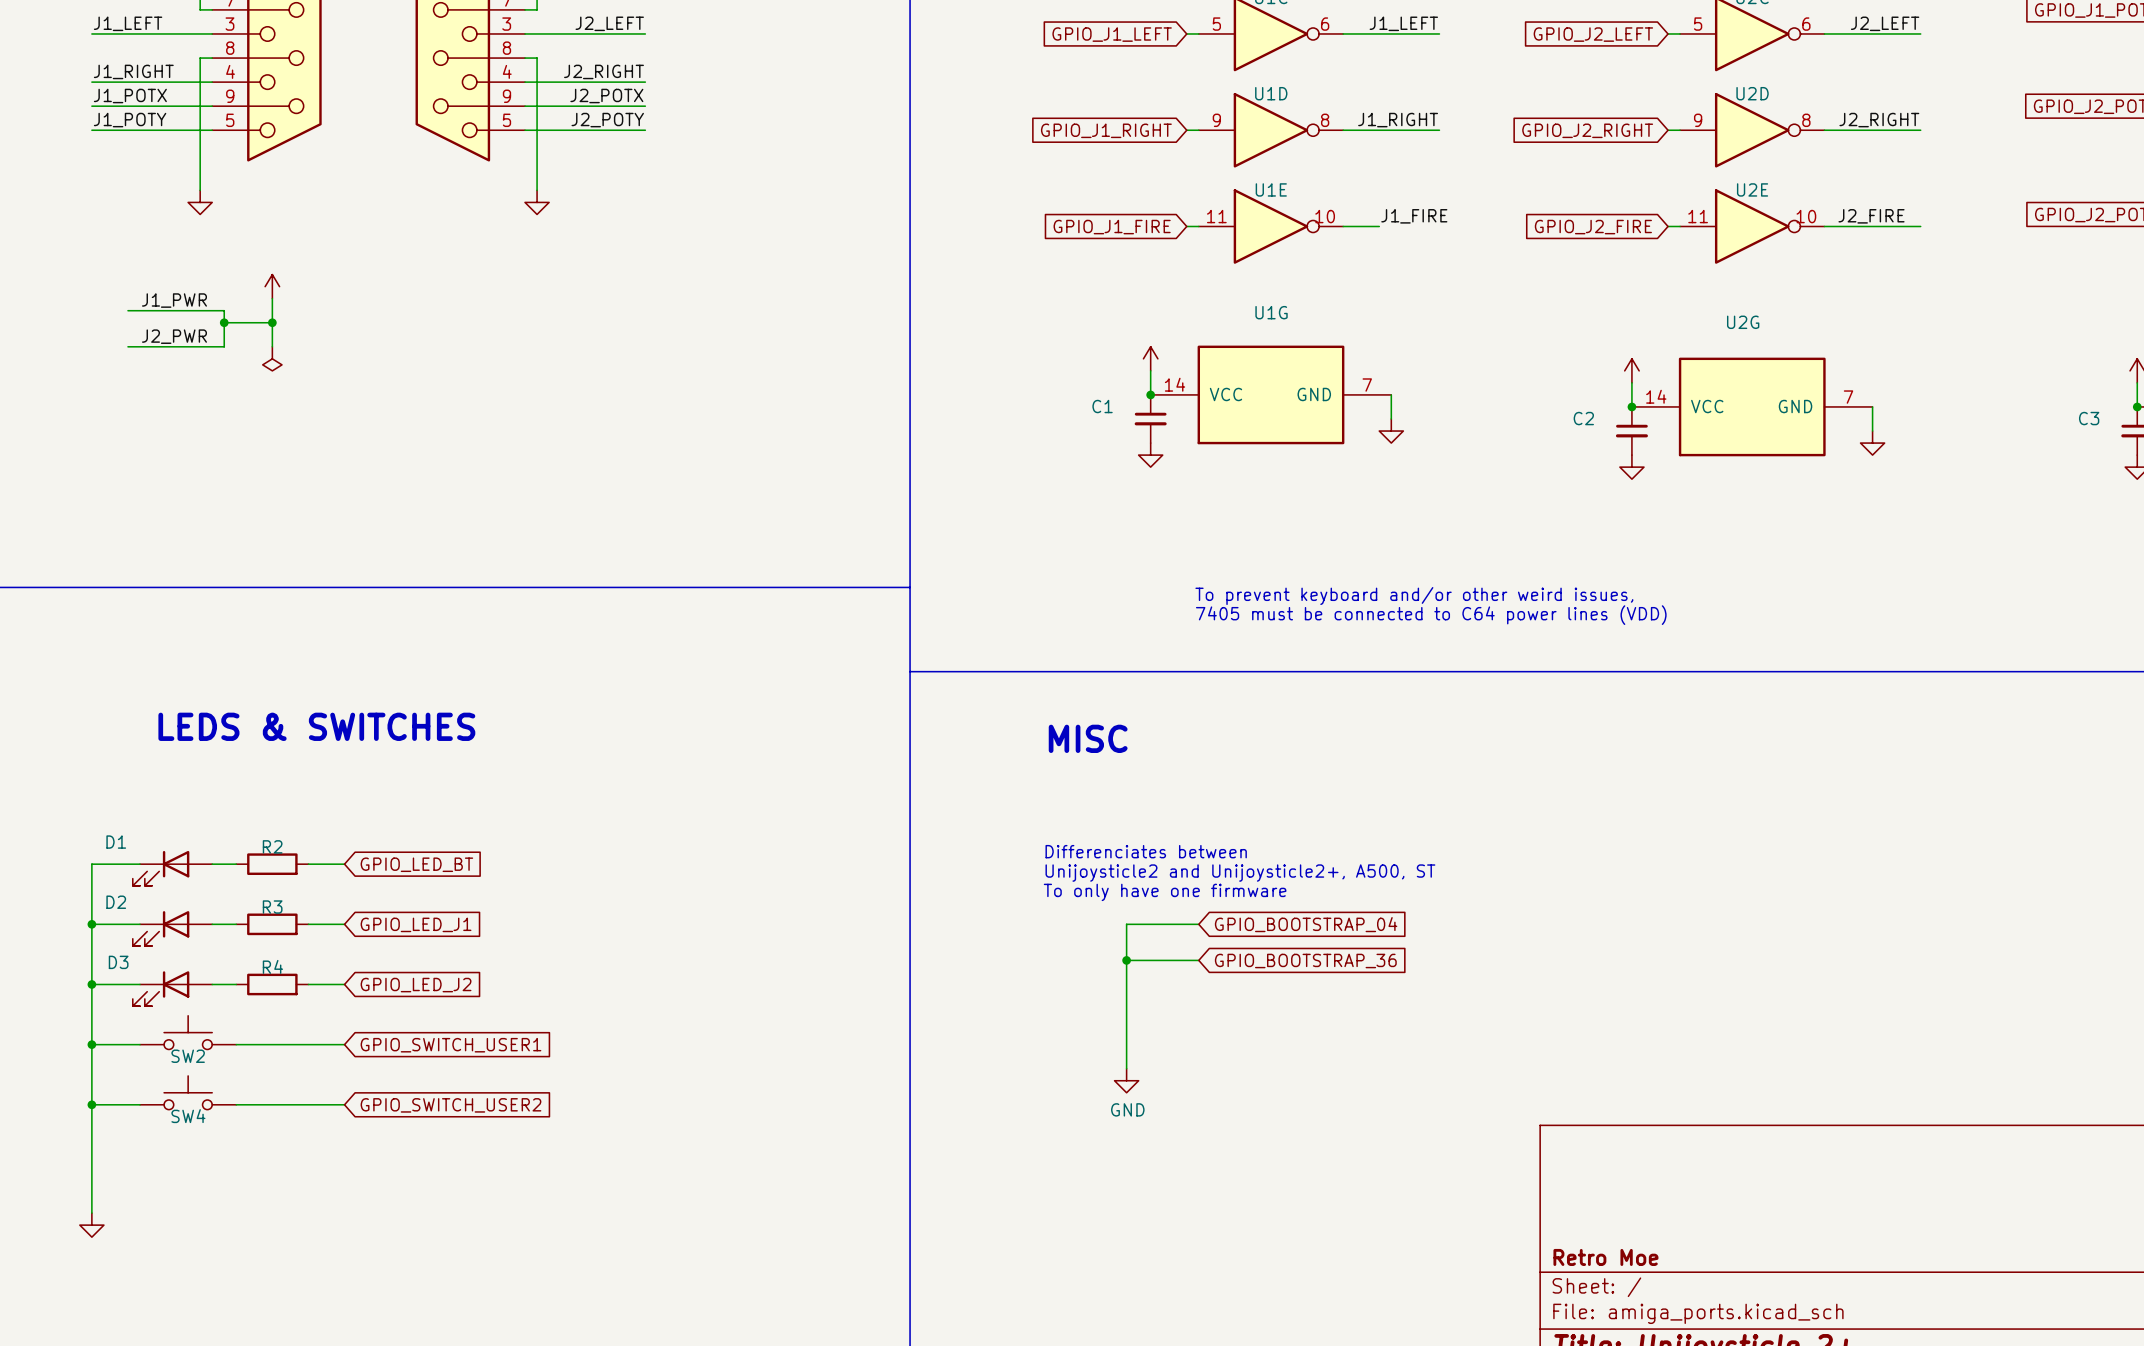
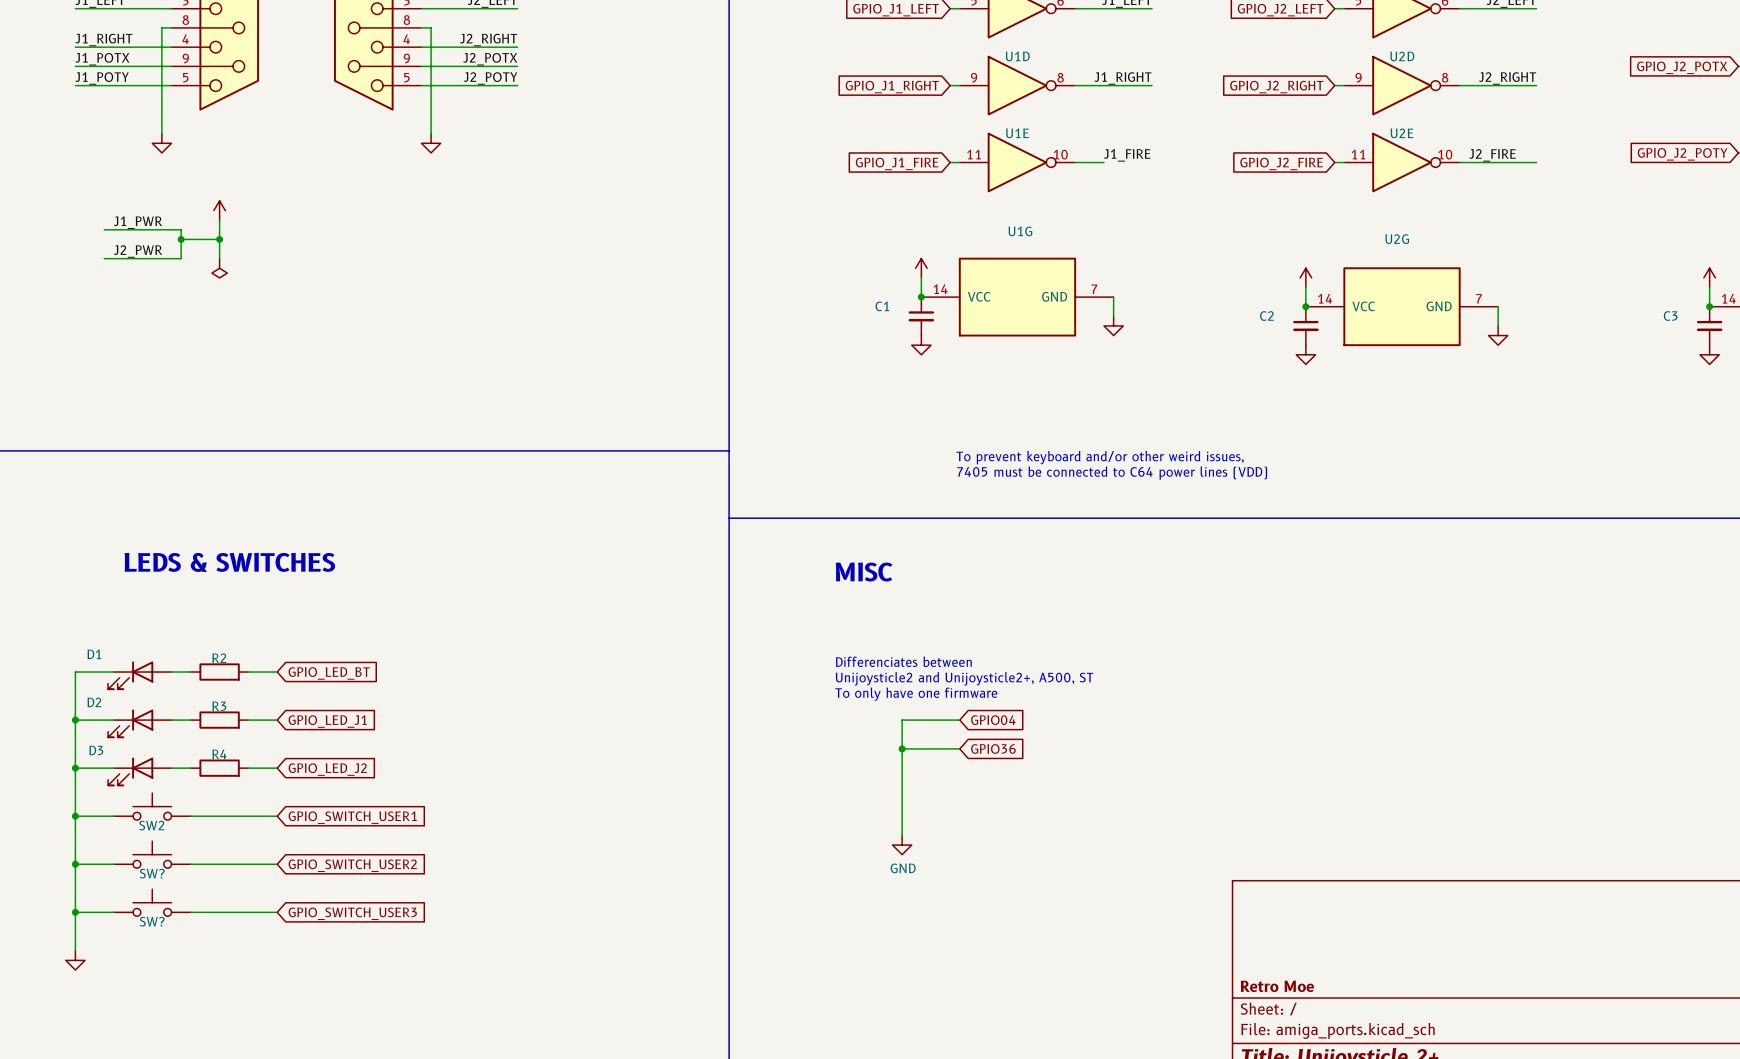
global label: GPIO_BOOTSTRAP_04 (1306, 924) -> GPIO04 (993, 720)
global label: GPIO_BOOTSTRAP_36 (1305, 961) -> GPIO36 (993, 748)
SW4 name: SW4 (188, 1116) -> SW? (152, 873)
SW?: none -> (152, 902)
wire: none -> (75, 912) (113, 912)
junction: none -> (75, 912)
wire: none -> (190, 912) (277, 912)
global label: none -> GPIO_SWITCH_USER3 (352, 913)

